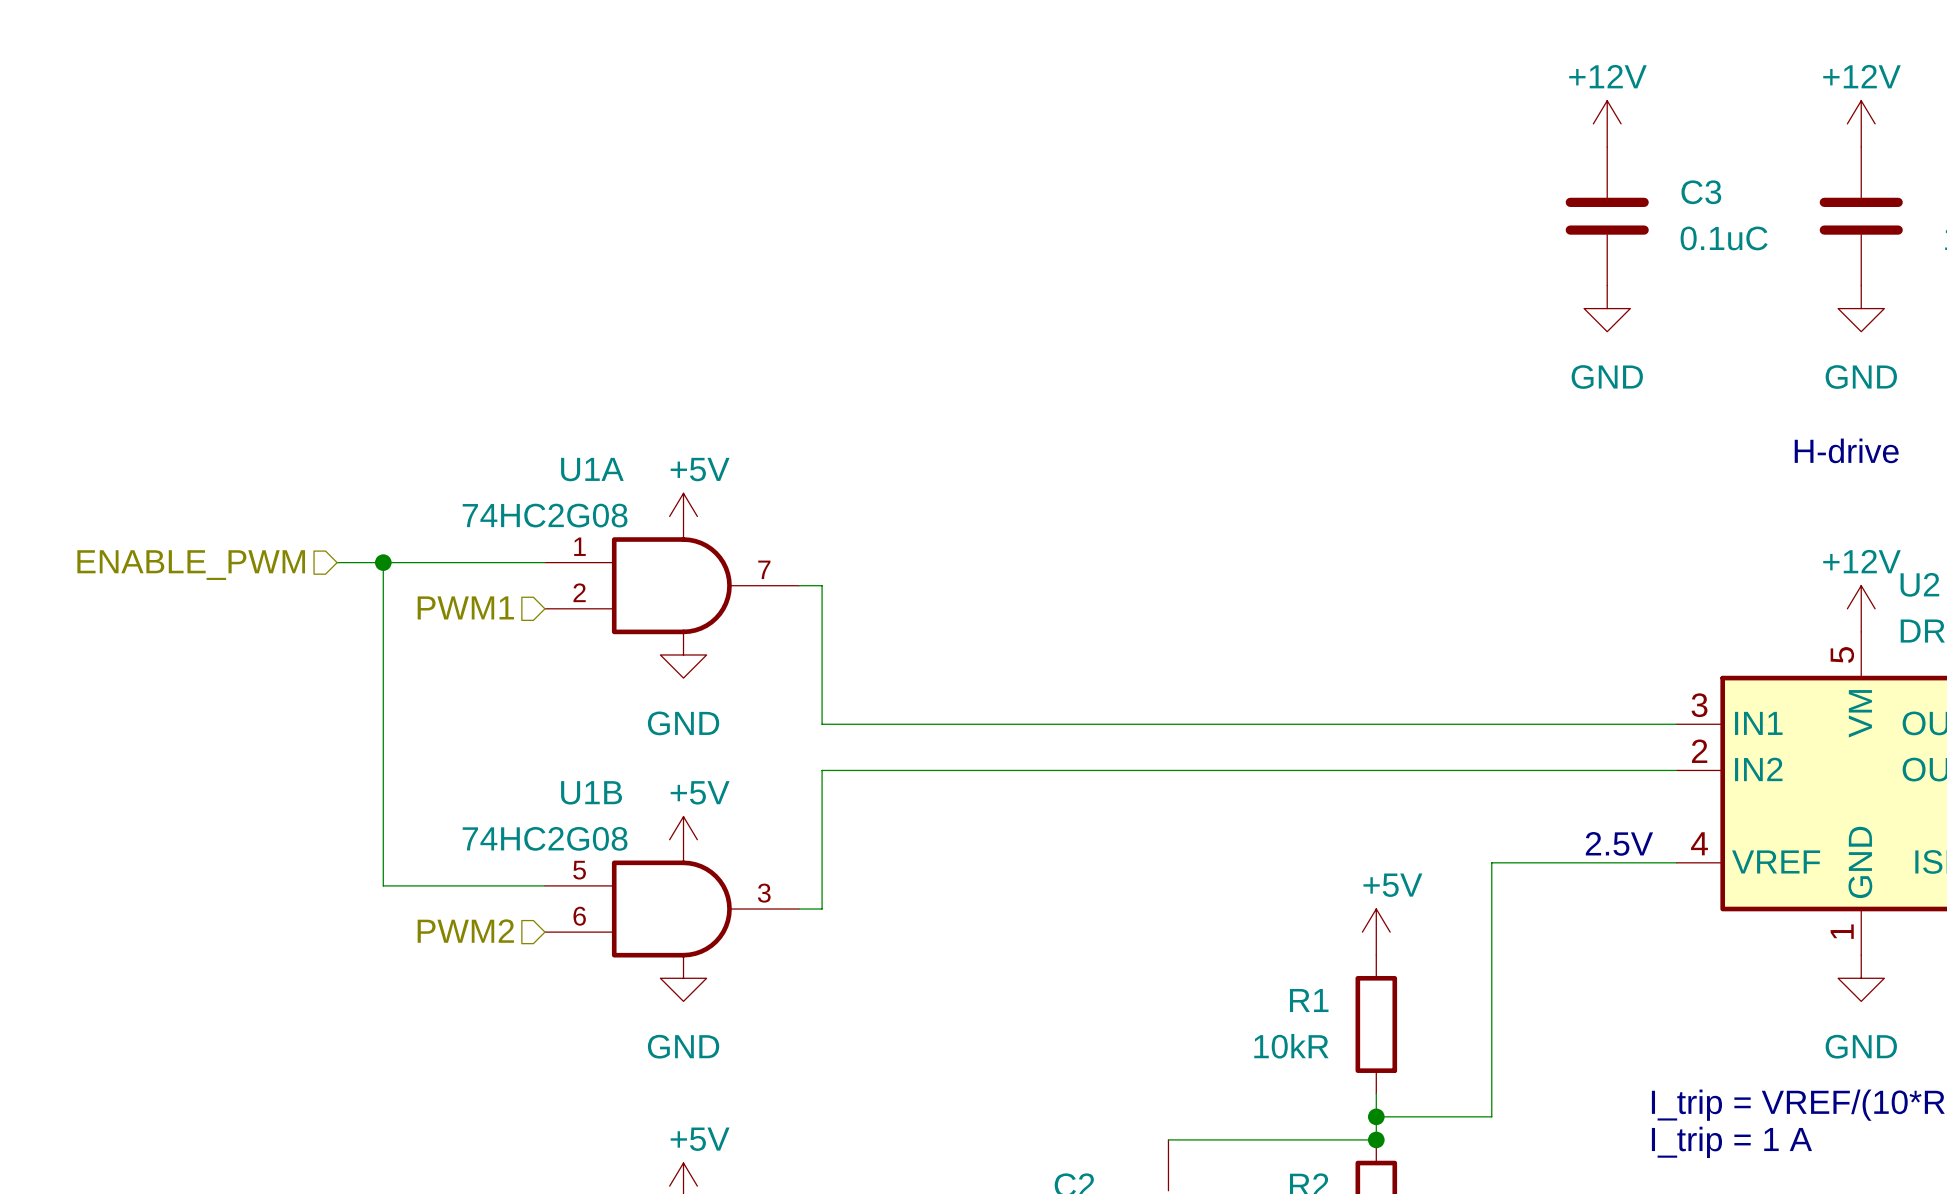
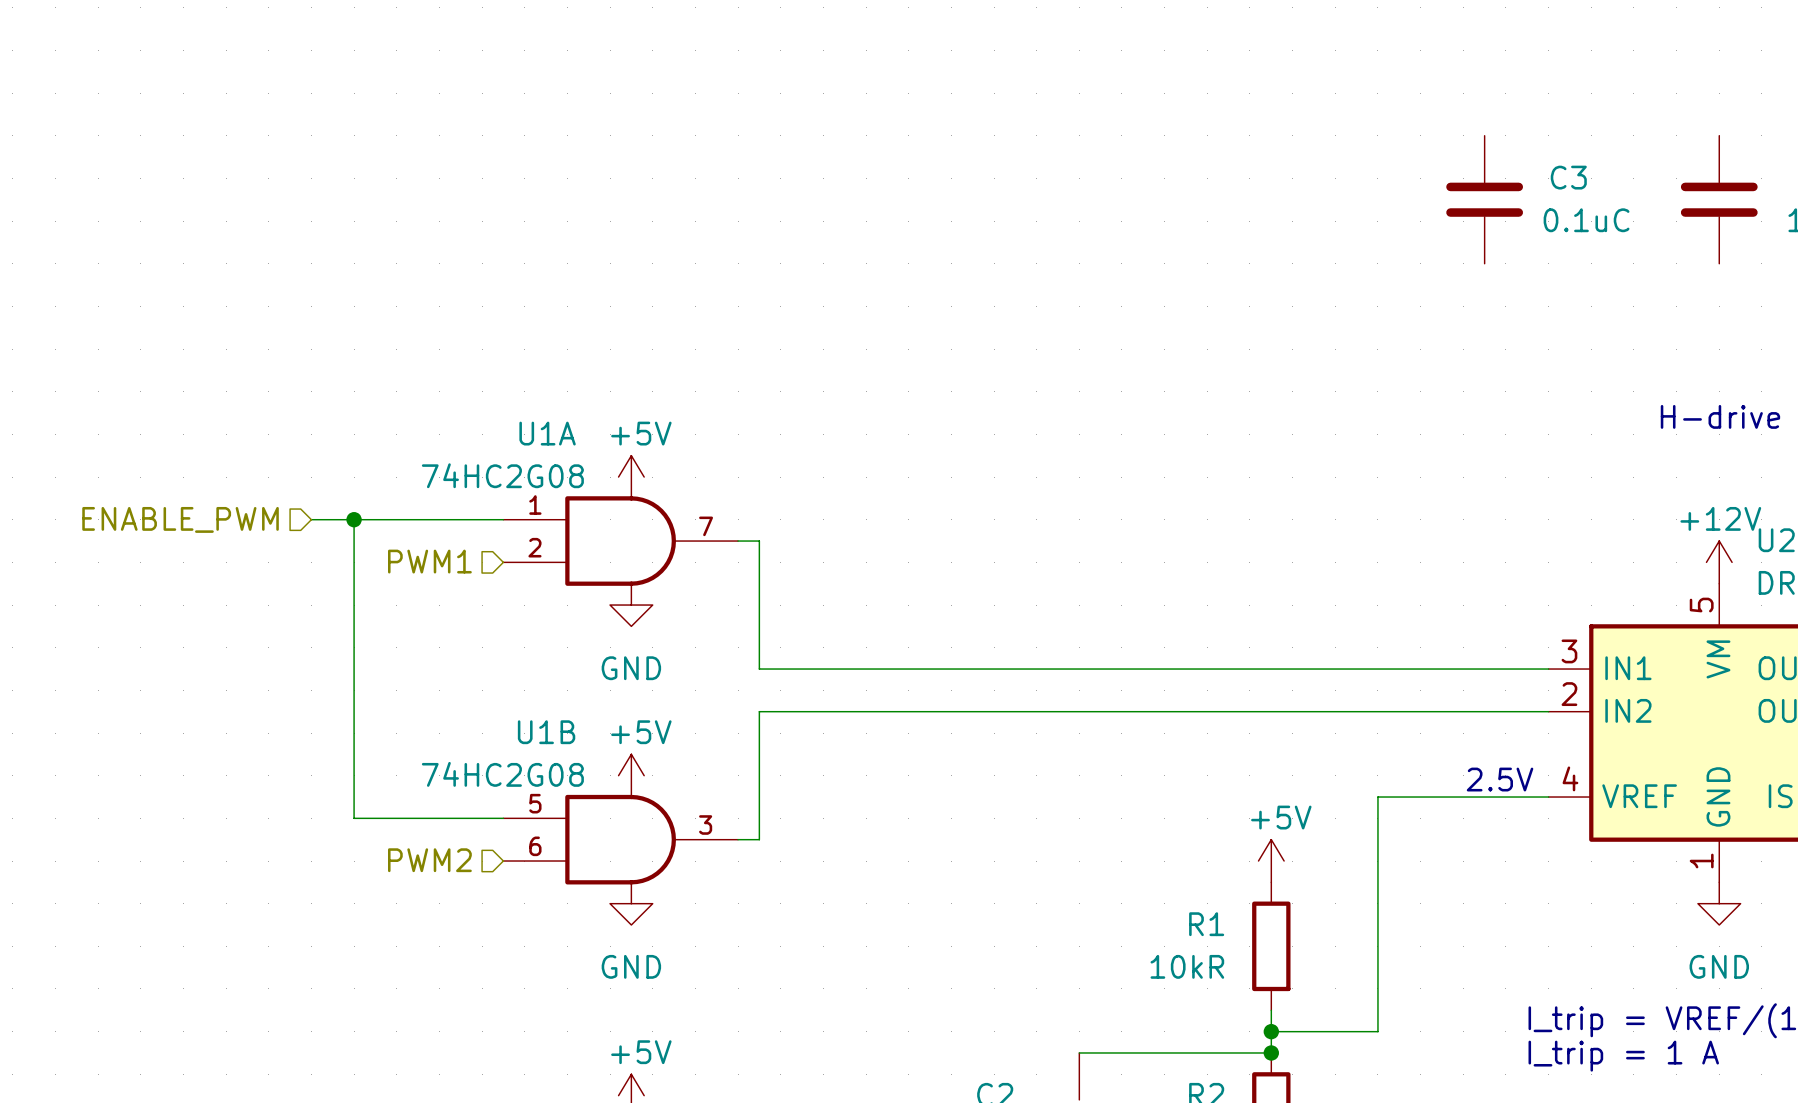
power symbol: +12V (1607, 123) -> none
power symbol: +12V (1861, 123) -> none
power symbol: GND (1607, 308) -> none
power symbol: GND (1861, 308) -> none

